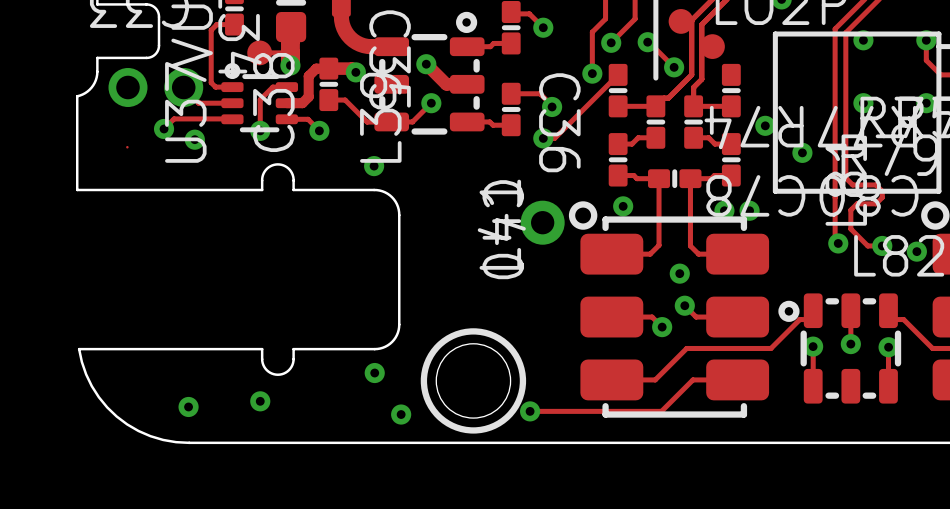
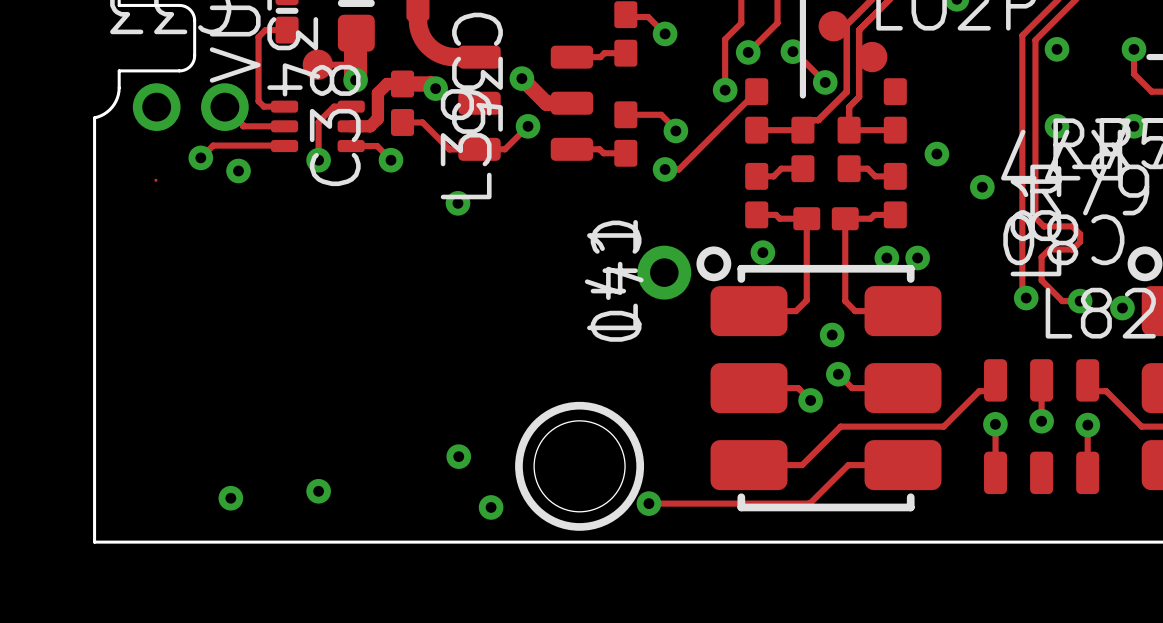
part footprint: [501, 0, 521, 55] -> [614, 1, 638, 67]
part footprint: [374, 11, 485, 135] -> [458, 45, 594, 161]
line: (775, 34) (938, 34) (938, 191) (775, 191) (775, 34) -> none
part footprint: [319, 57, 339, 112] -> [390, 70, 415, 136]
part footprint: [221, 62, 299, 133] -> [270, 100, 365, 153]
part footprint: [608, 63, 628, 118] -> [745, 78, 769, 144]
part footprint: [721, 63, 741, 118] -> [883, 78, 907, 144]
part footprint: [501, 82, 521, 137] -> [614, 101, 638, 167]
part footprint: [646, 95, 666, 149] -> [791, 116, 815, 183]
part footprint: [684, 95, 704, 149] -> [837, 116, 861, 183]
text: U37 (185, 112) -> none
text: C36 (559, 122) -> none
text: R74 (754, 127) -> none
part footprint: [608, 133, 628, 187] -> [745, 162, 769, 229]
part footprint: [721, 133, 741, 187] -> [883, 162, 907, 229]
part footprint: [648, 169, 702, 189] -> [793, 207, 859, 231]
board edge: (77, 189) (262, 189) (262, 178) (264, 171) (270, 166) (277, 164) (285, 166) (290, 171) (293, 178) (293, 189) (376, 190) (387, 193) (396, 204) (399, 215) (399, 327) (395, 337) (385, 346) (374, 349) (293, 349) (291, 366) (285, 372) (277, 374) (270, 372) (264, 366) (262, 349) (79, 349) (86, 374) (91, 386) (107, 407) (116, 416) (127, 424) (150, 436) (163, 439) (189, 442) -> (94, 232) (94, 542) (231, 542)
text: C78 (755, 195) -> none
part footprint: [778, 293, 902, 404] -> [984, 359, 1100, 495]

